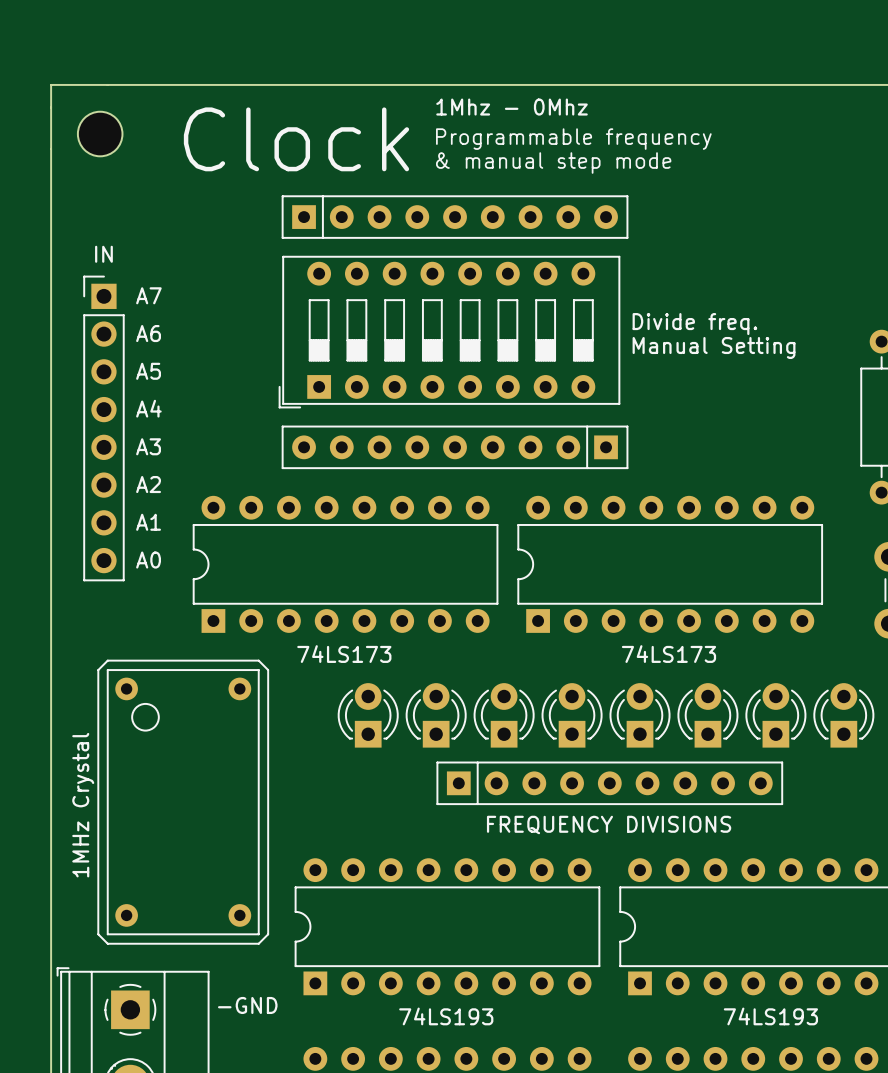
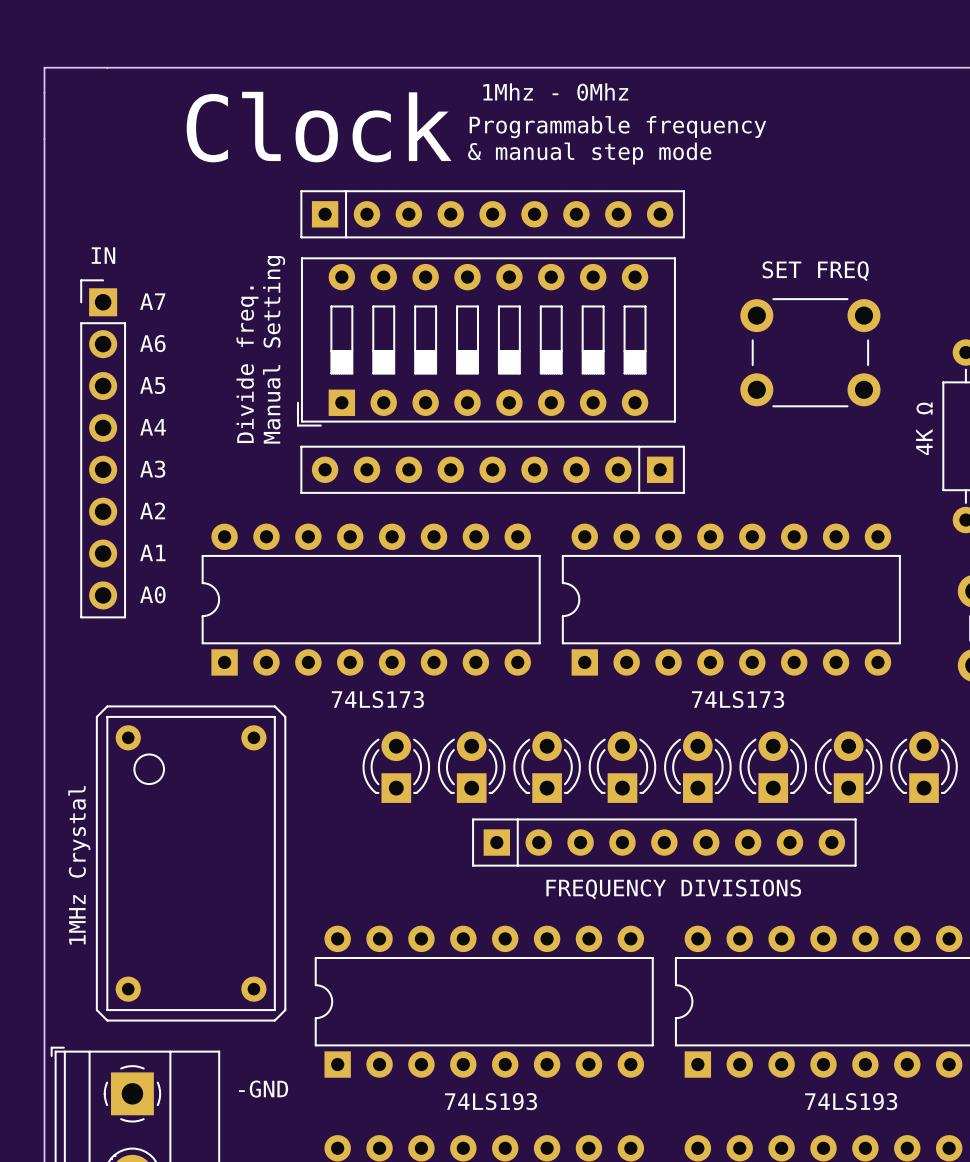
part: (100, 134) -> none
text: none -> SET FREQ (815, 271)
text: Divide freq. (694, 324) -> none
text: none -> Manual Setting (274, 349)
part: none -> (810, 352)
text: Manual Setting (714, 347) -> none
text: none -> Divide freq. (247, 364)
text: none -> 4K Ω (924, 428)

